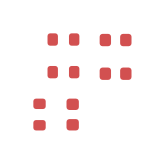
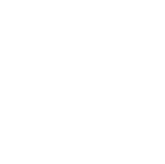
part: (63, 39) -> none
part: (115, 40) -> none
part: (63, 72) -> none
part: (115, 73) -> none
part: (39, 114) -> none
part: (72, 114) -> none

